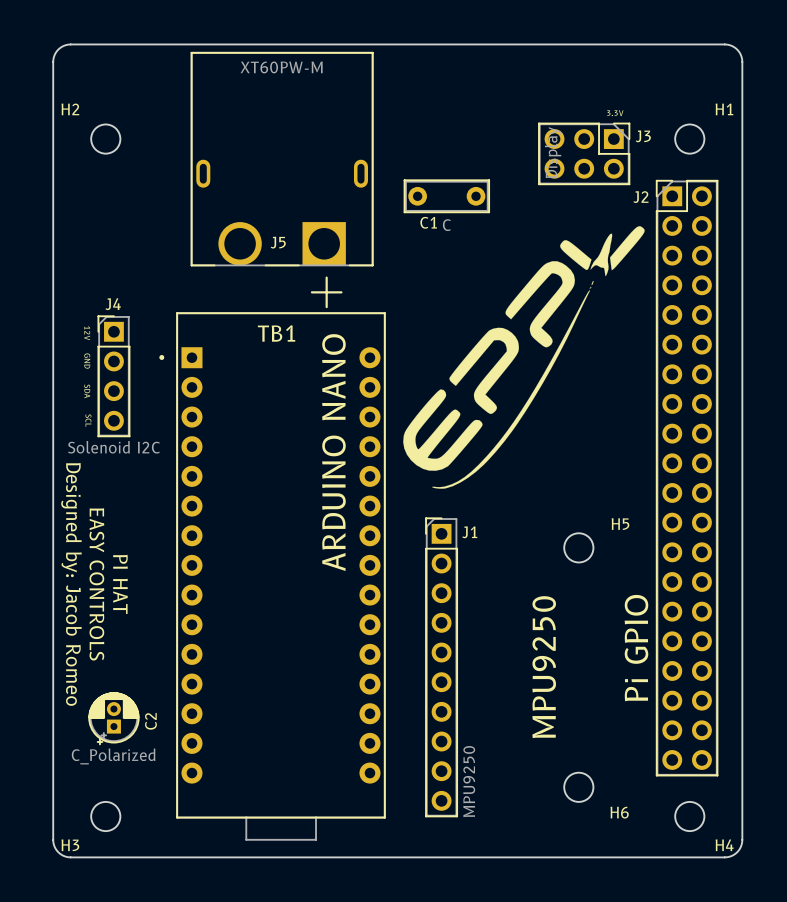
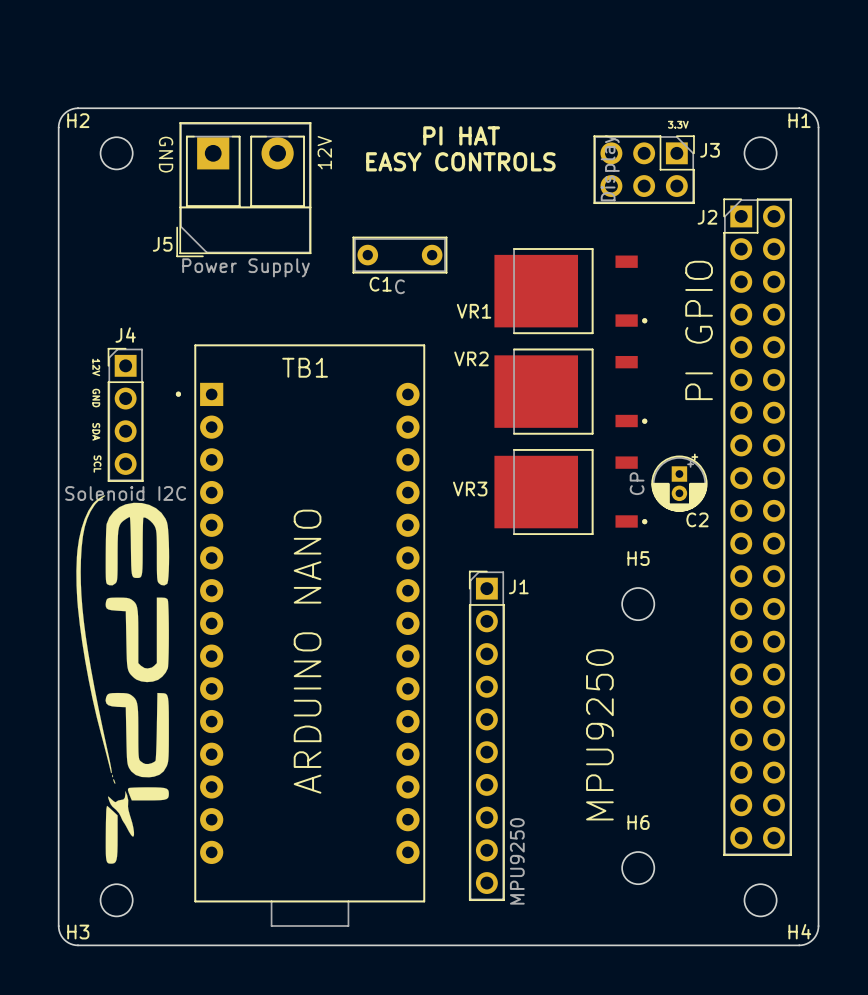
J5 footprint: [190, 52, 374, 308] -> [176, 122, 312, 258]
J5 value: XT60PW-M (281, 67) -> Power Supply (246, 267)
board edge: (53, 115) (53, 57) (60, 48) (70, 44) (727, 44) (737, 49) (741, 57) (742, 115) -> (58, 127) (64, 113) (77, 108) (799, 108) (812, 113) (818, 127)
text: none -> PI HAT (461, 135)
text: none -> 12V (324, 152)
text: none -> GND (166, 154)
text: none -> EASY CONTROLS (460, 161)
C1 position: (446, 196) -> (399, 255)
drawing: [403, 226, 645, 489] -> none
J5 name position: J5 (278, 242) -> J5 (162, 244)
VR1: none -> (570, 291)
VR2: none -> (570, 391)
VR3: none -> (570, 492)
drawing: none -> [76, 495, 170, 864]
TB1 value position: ARDUINO NANO (333, 452) -> ARDUINO NANO (307, 651)
H5 name position: H5 (620, 524) -> H5 (638, 558)
text: Designed by: Jacob Romeo (71, 584) -> none
text: EASY CONTROLS (96, 584) -> none
text: PI HAT (120, 584) -> none
J2 value: Pi GPIO (636, 648) -> PI GPIO (699, 330)
C2 rotation: 0° (113, 718) -> 180° (679, 482)
C2 position: (113, 718) -> (679, 482)
C2 name position: C2 (150, 721) -> C2 (697, 519)
C2 value: C_Polarized (113, 756) -> CP (637, 483)
H6 name position: H6 (619, 812) -> H6 (638, 822)

